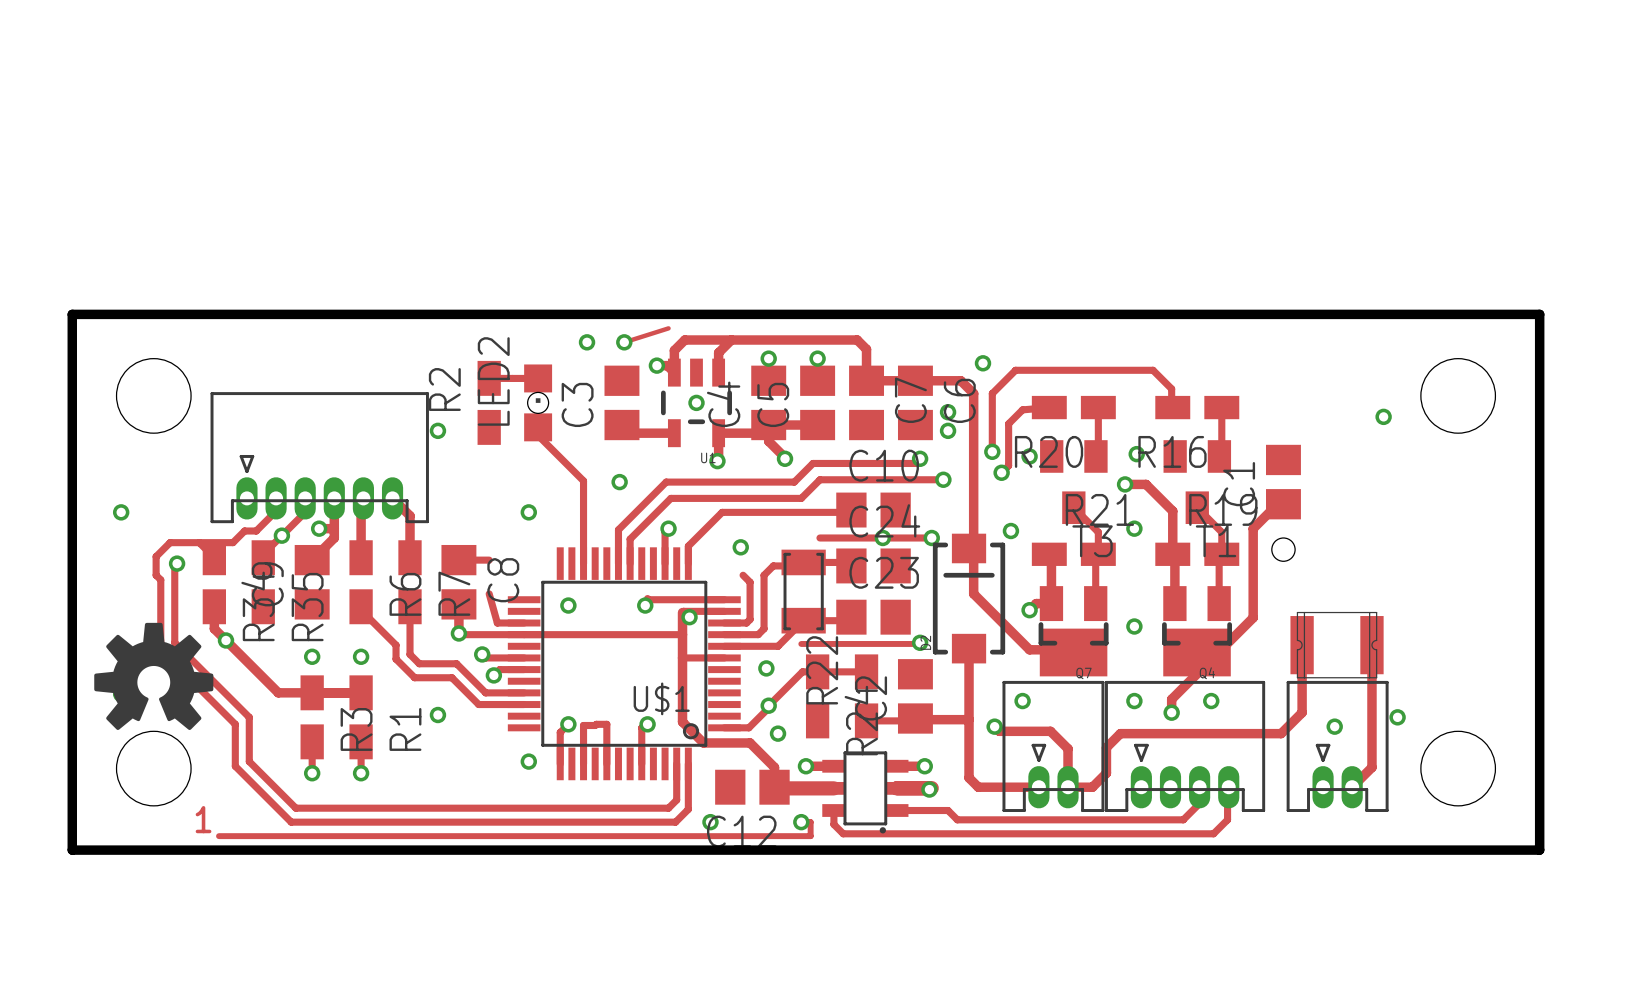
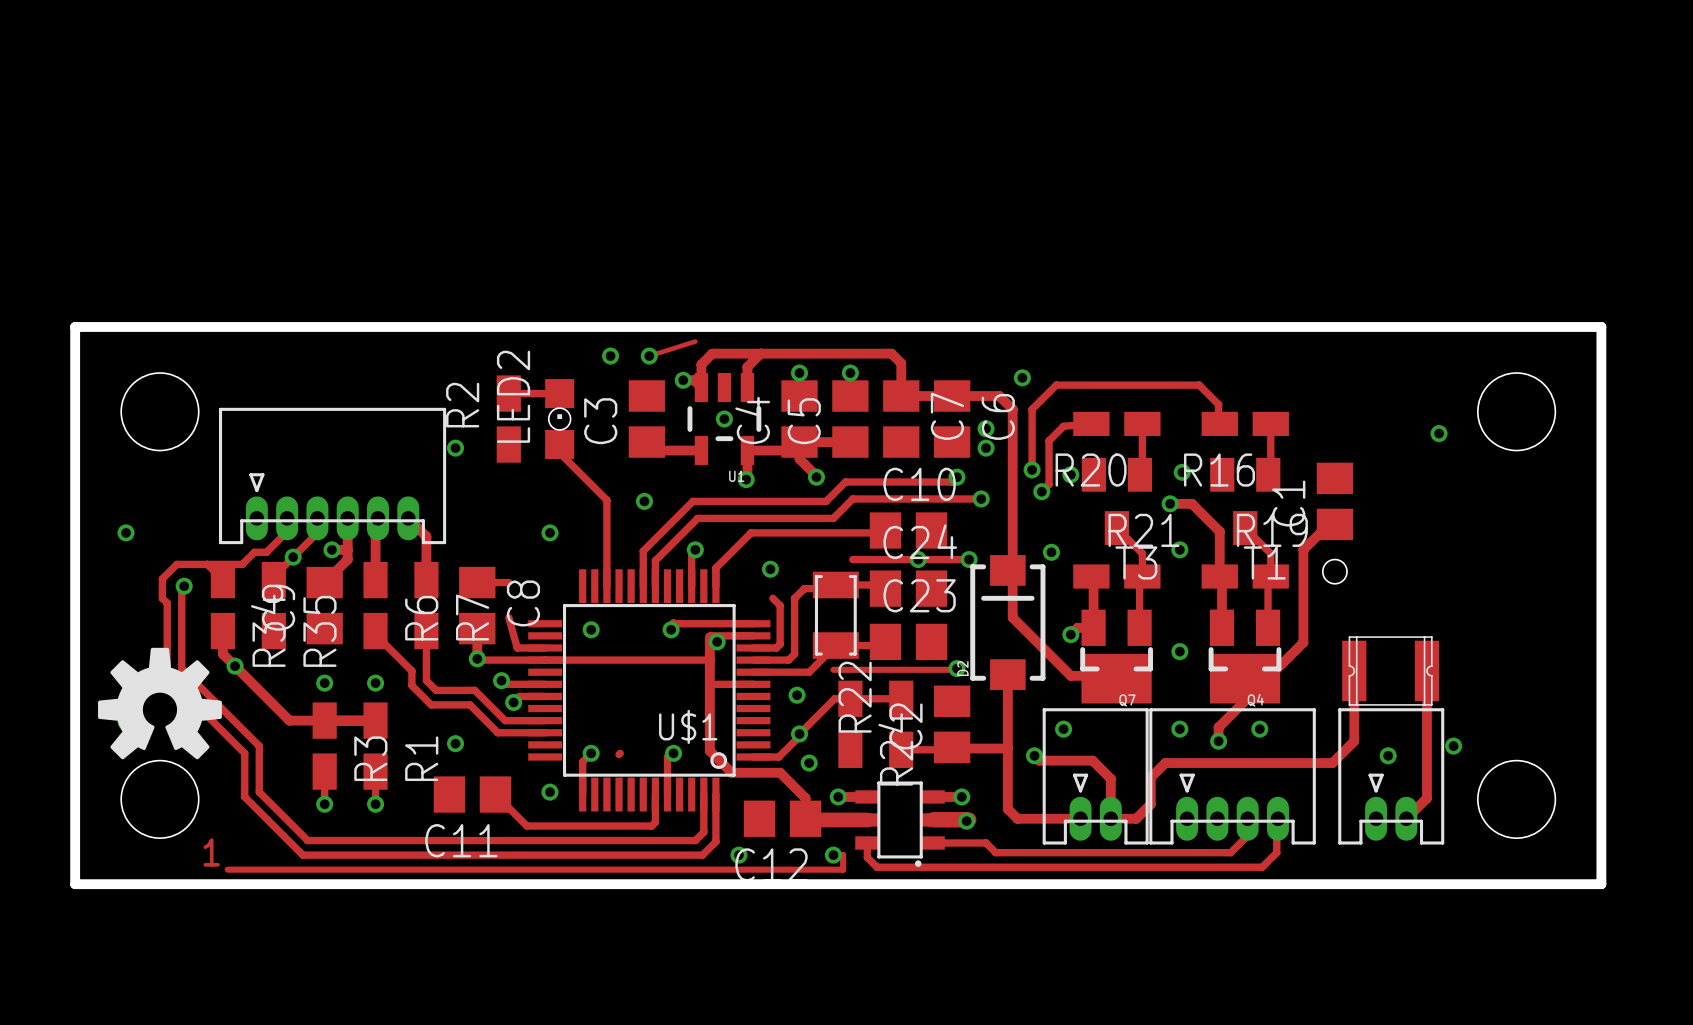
track: (596, 724) (606, 724) (606, 763) -> none
track: (595, 725) (583, 725) (583, 763) -> none
C11: none -> (472, 794)
track: none -> (495, 794) (526, 826) (651, 826) (655, 822) (655, 794)

